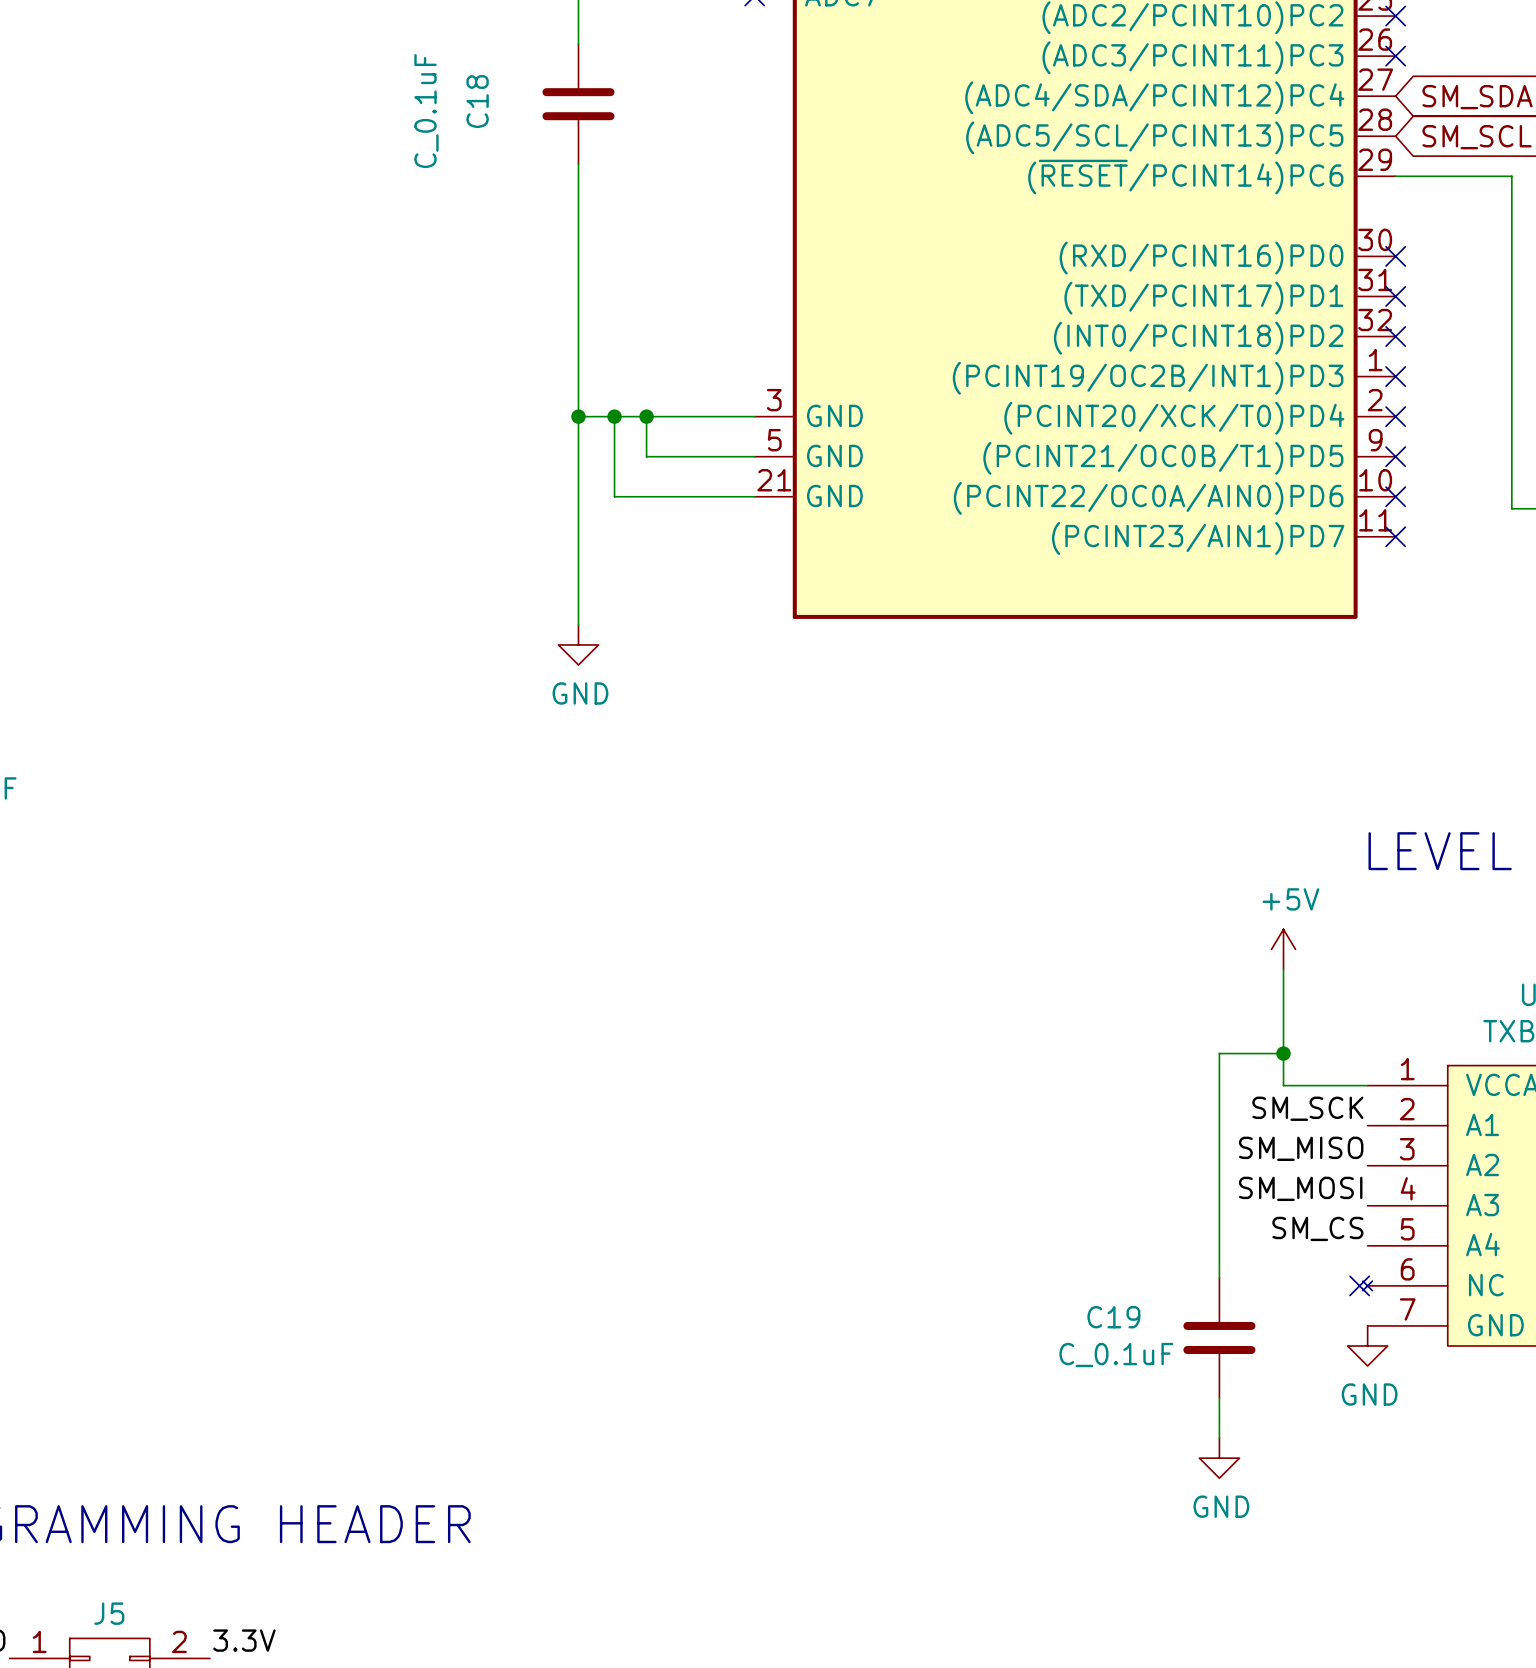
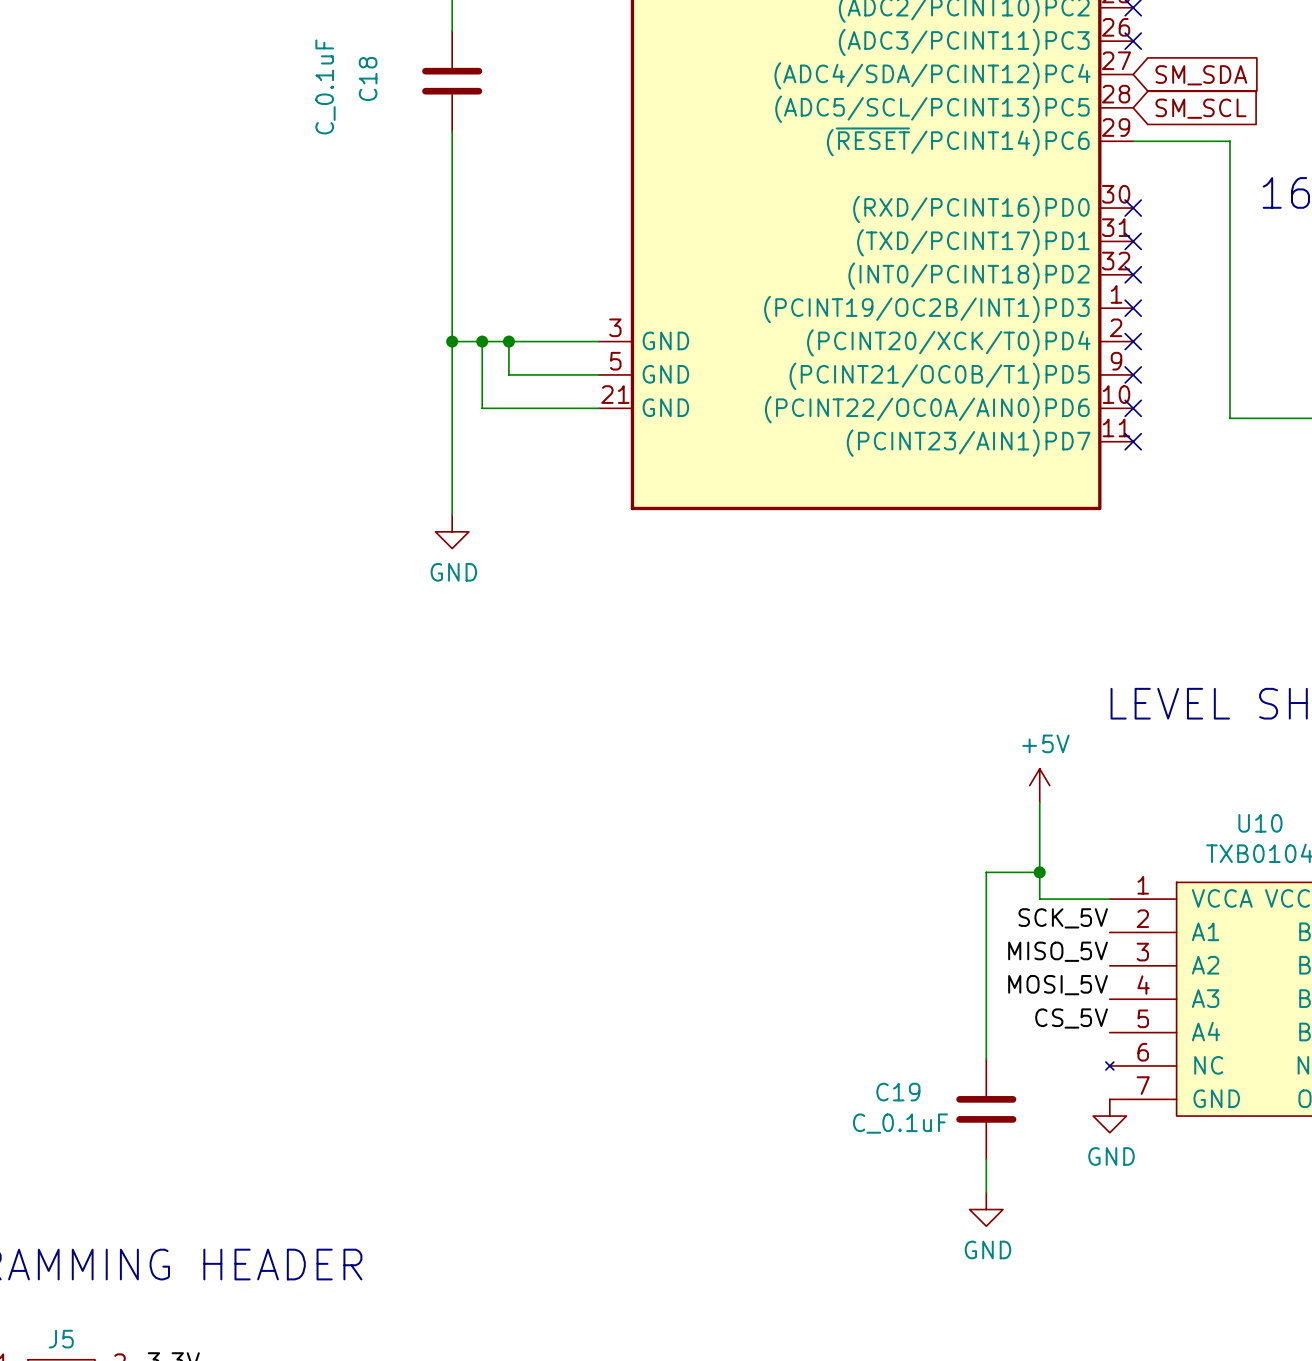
label: SM_SCK (1307, 1108) -> SCK_5V (1063, 918)
label: SM_MISO (1301, 1148) -> MISO_5V (1058, 951)
label: SM_MOSI (1300, 1188) -> MOSI_5V (1058, 985)
label: SM_CS (1317, 1228) -> CS_5V (1071, 1018)
no-connect mark: (1359, 1285) -> none

